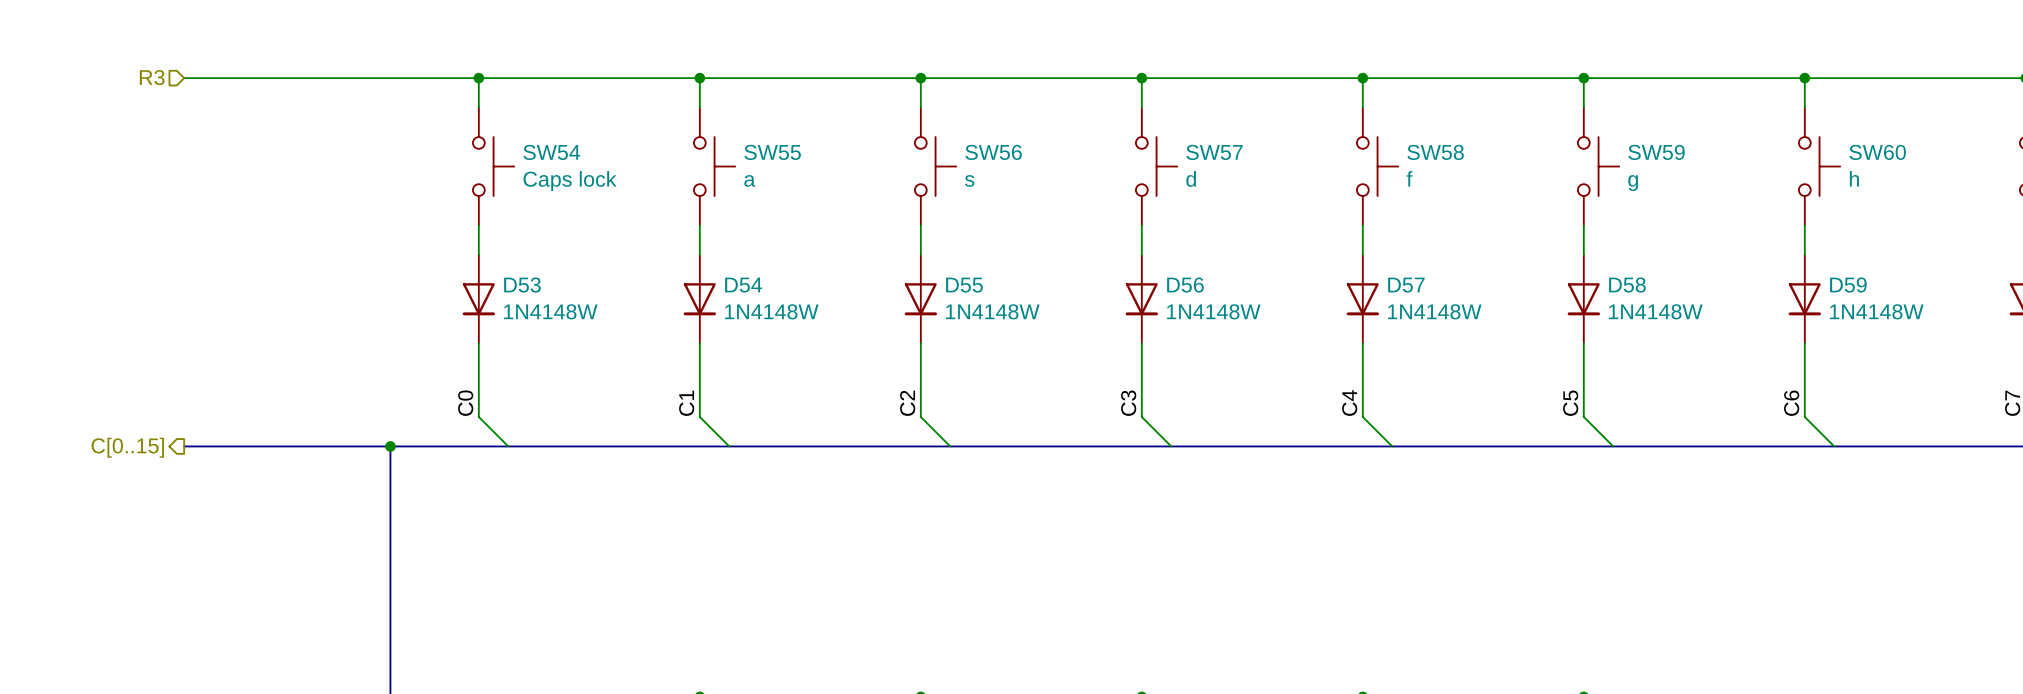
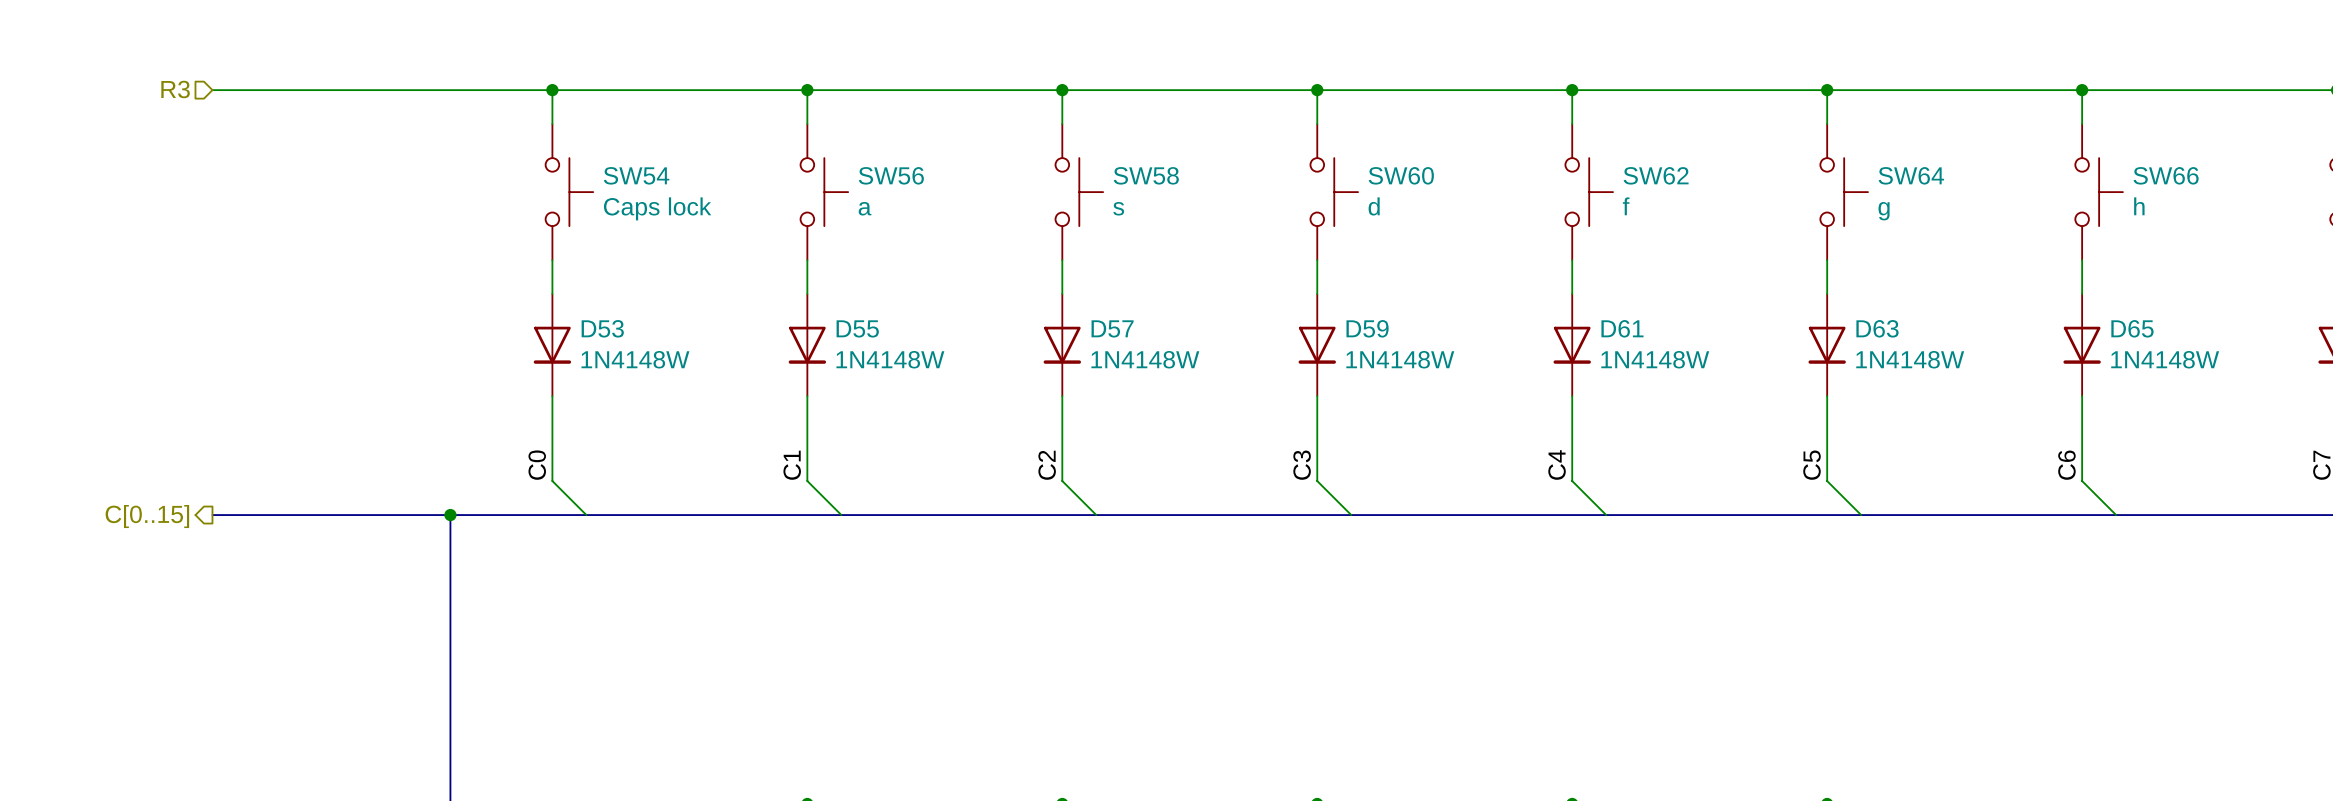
SW55 name: SW55 (772, 152) -> SW56 (891, 175)
SW56 name: SW56 (993, 152) -> SW58 (1146, 175)
SW57 name: SW57 (1214, 152) -> SW60 (1401, 175)
SW58 name: SW58 (1435, 152) -> SW62 (1656, 175)
SW59 name: SW59 (1656, 152) -> SW64 (1911, 175)
SW60 name: SW60 (1877, 152) -> SW66 (2166, 175)
D54 name: D54 (743, 285) -> D55 (857, 328)
D55 name: D55 (964, 285) -> D57 (1112, 328)
D56 name: D56 (1185, 285) -> D59 (1367, 328)
D57 name: D57 (1406, 285) -> D61 (1622, 328)
D58 name: D58 (1627, 285) -> D63 (1877, 328)
D59 name: D59 (1848, 285) -> D65 (2132, 328)

